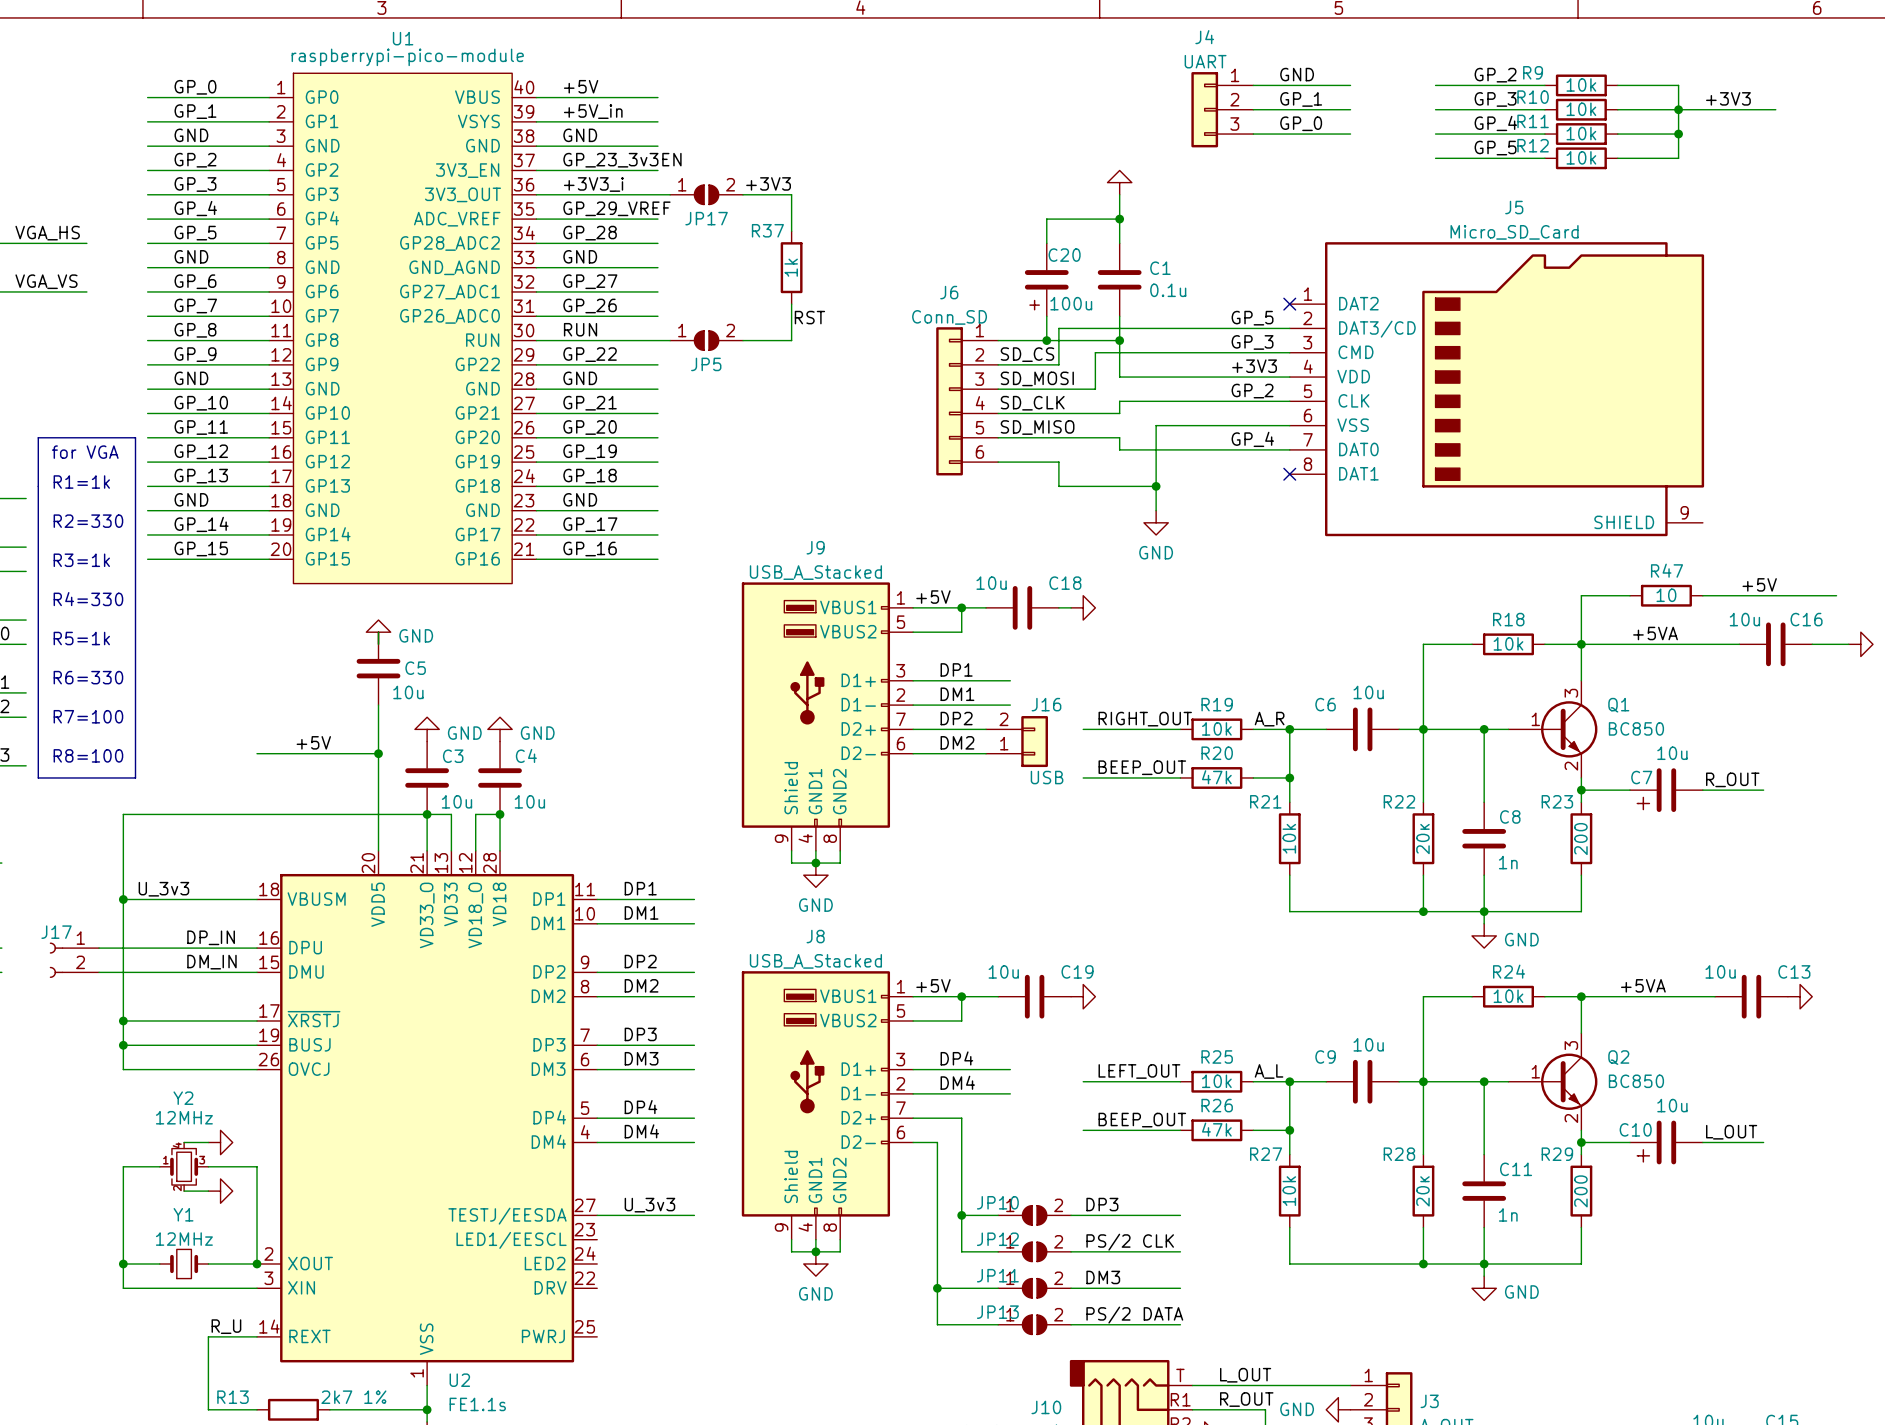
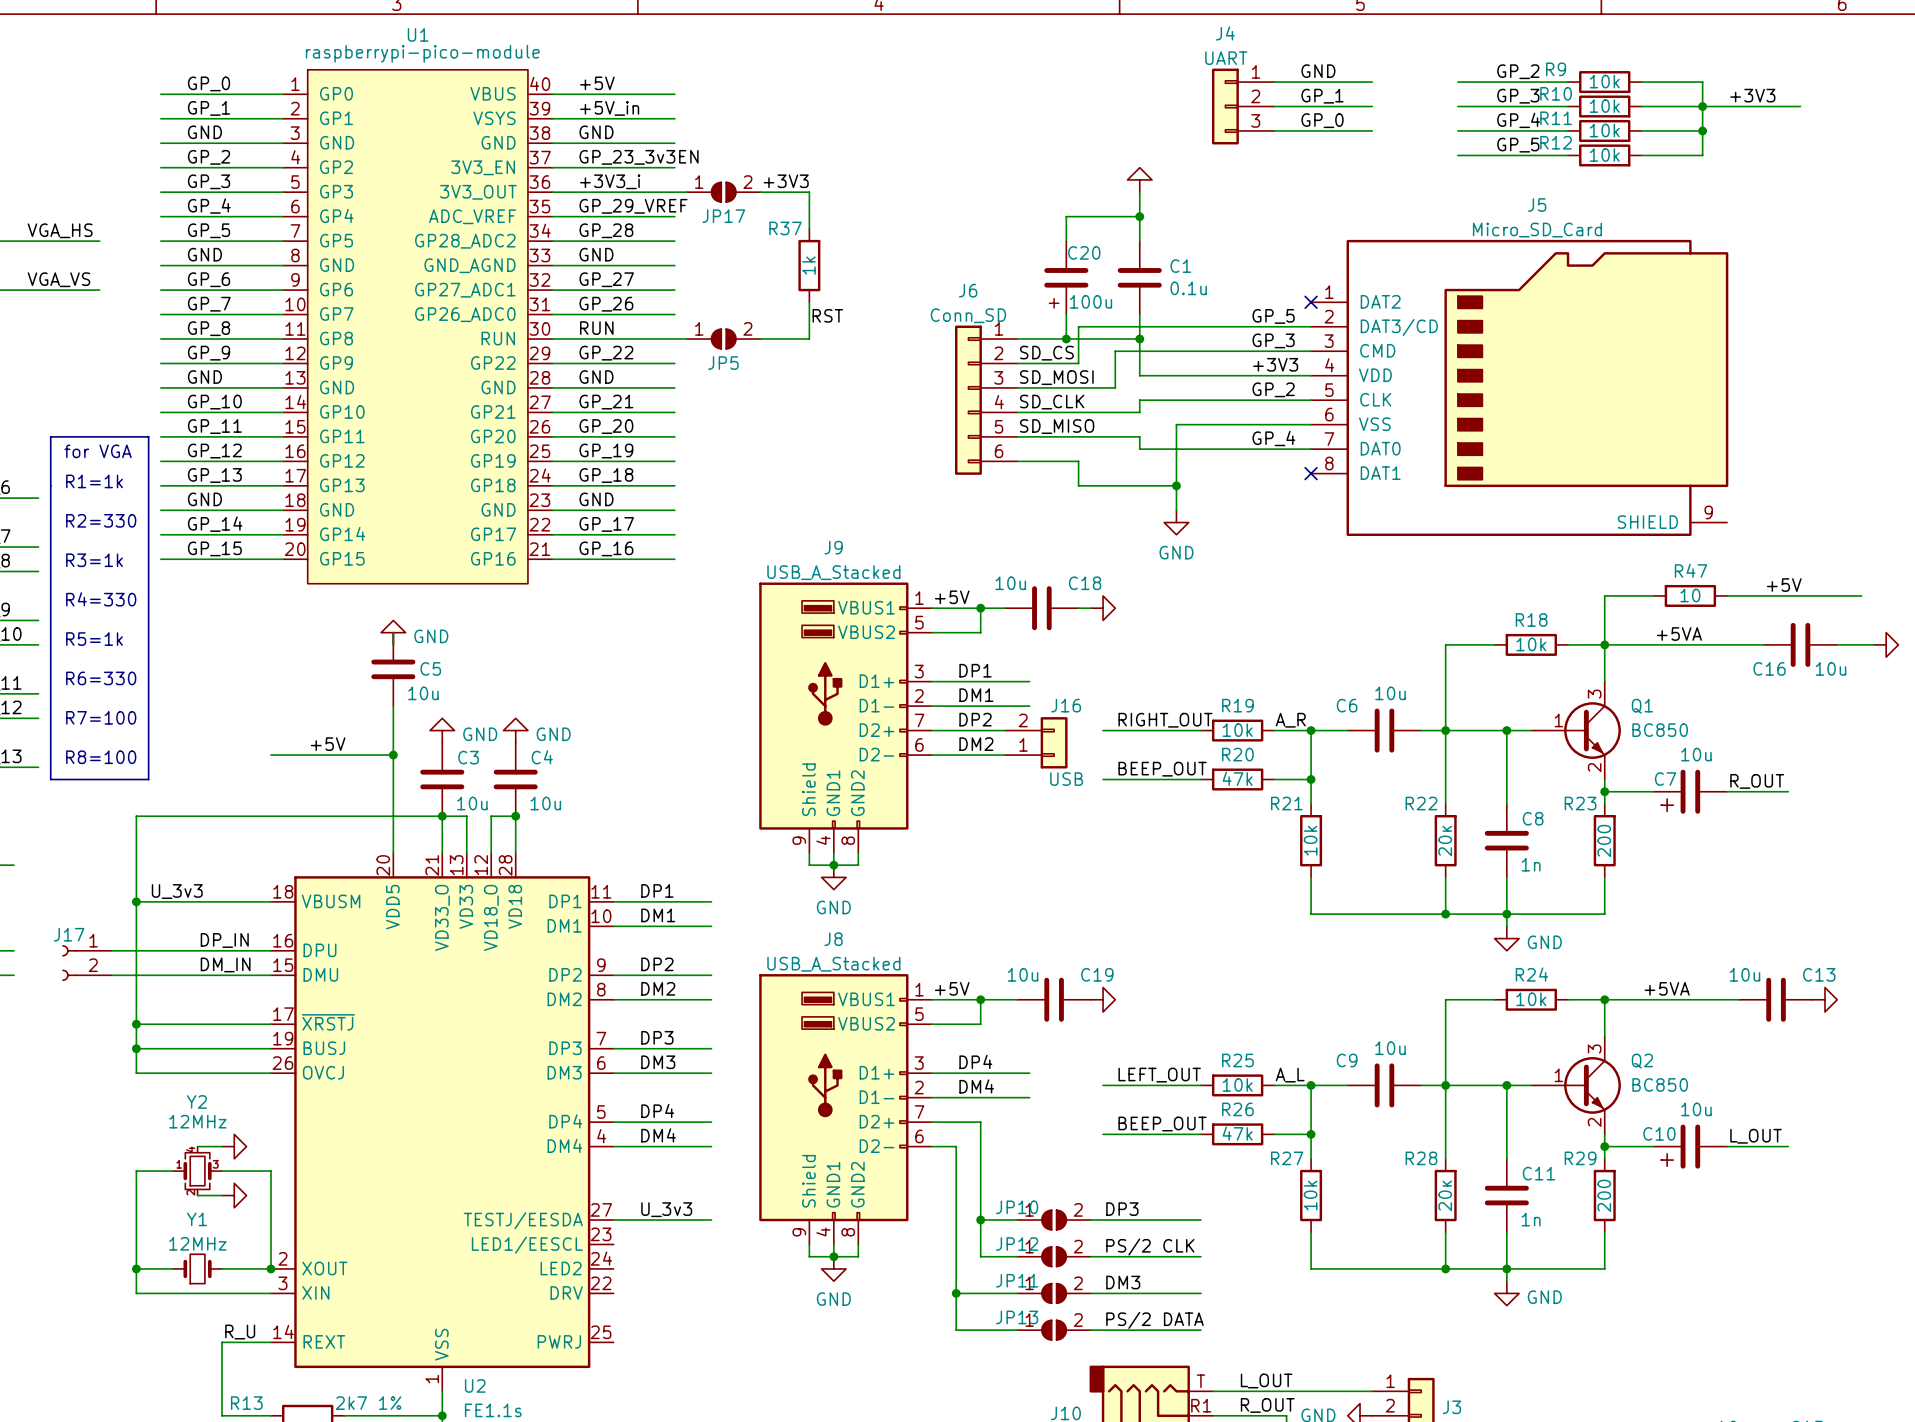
C16 value position: 10u (1744, 619) -> 10u (1831, 668)
C16 name position: C16 (1806, 619) -> C16 (1769, 668)

